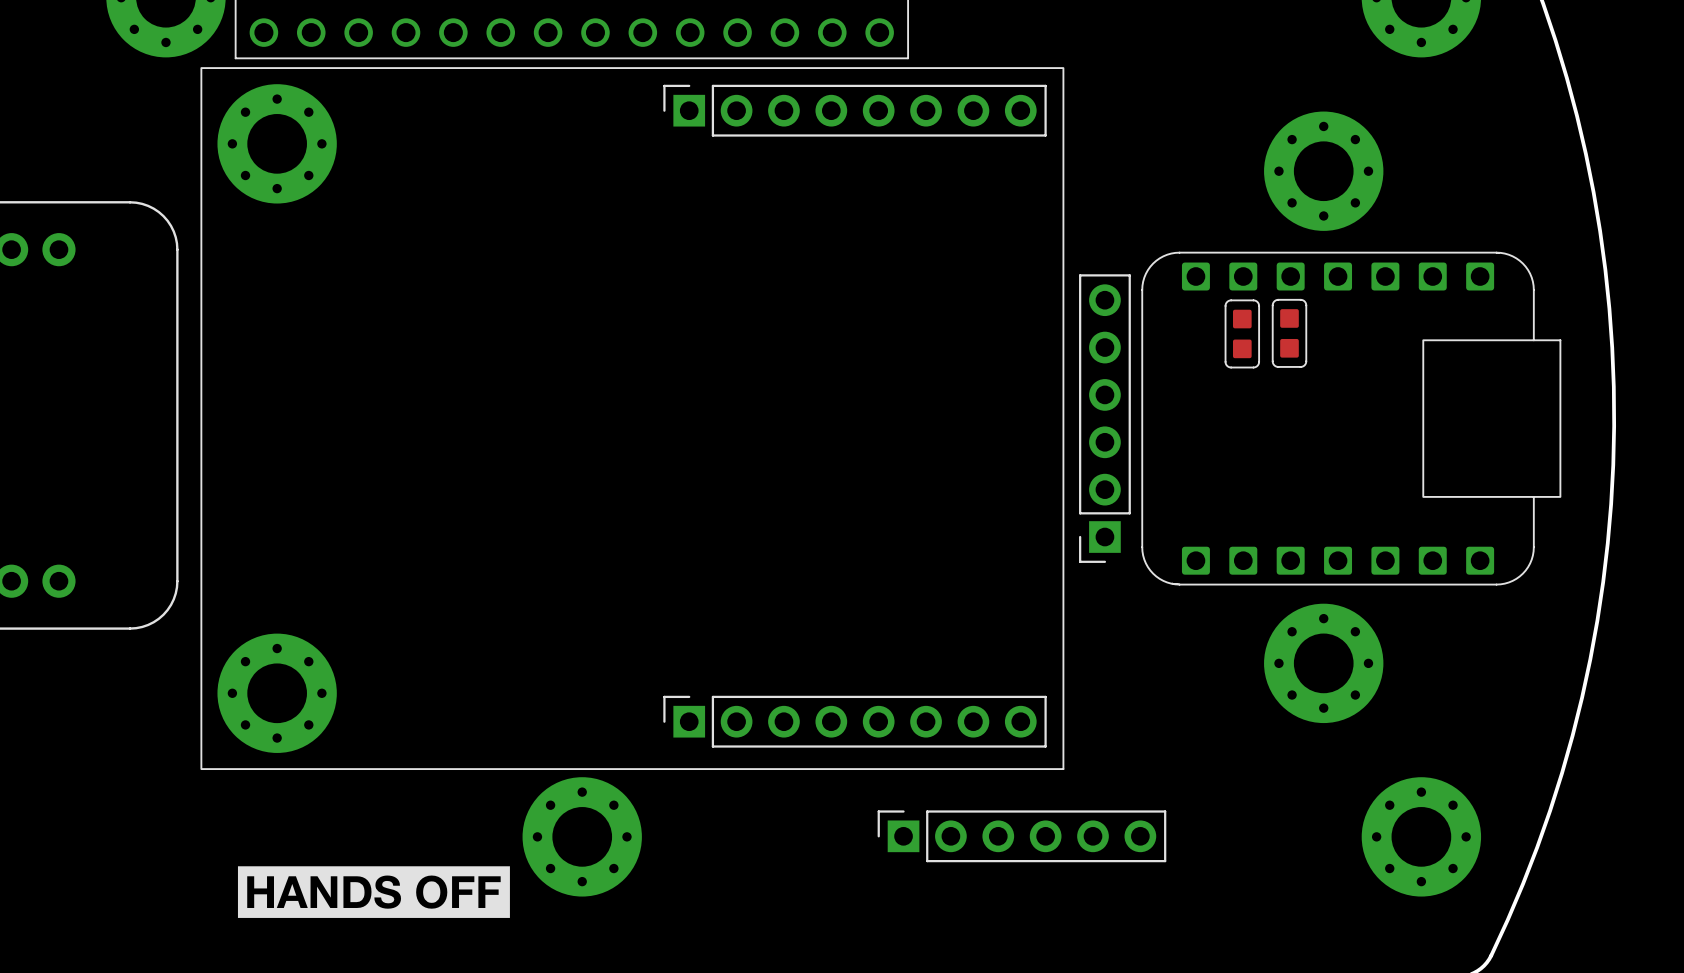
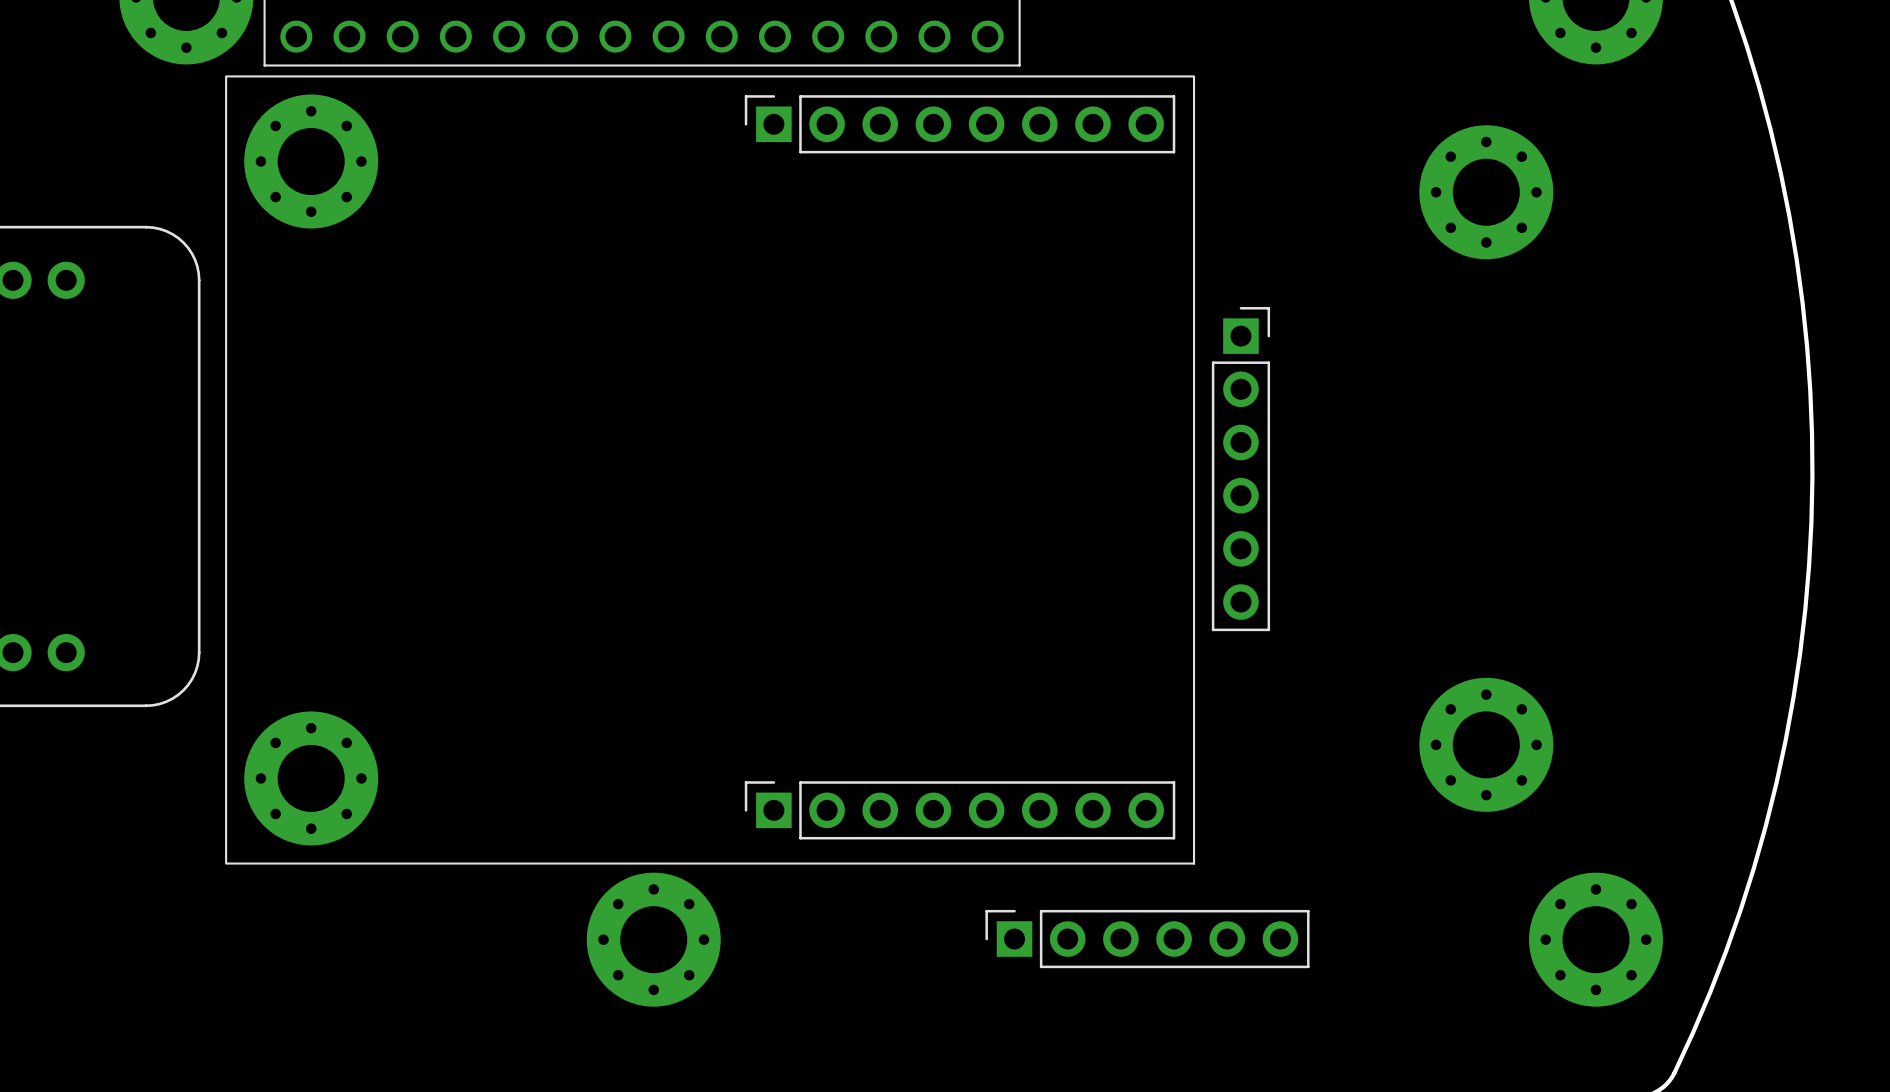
part: (1242, 333) -> none
part: (1289, 333) -> none
part rotation: 0° (1104, 418) -> 180° (1240, 469)
part: (1351, 418) -> none
drawing: [237, 866, 510, 918] -> none

